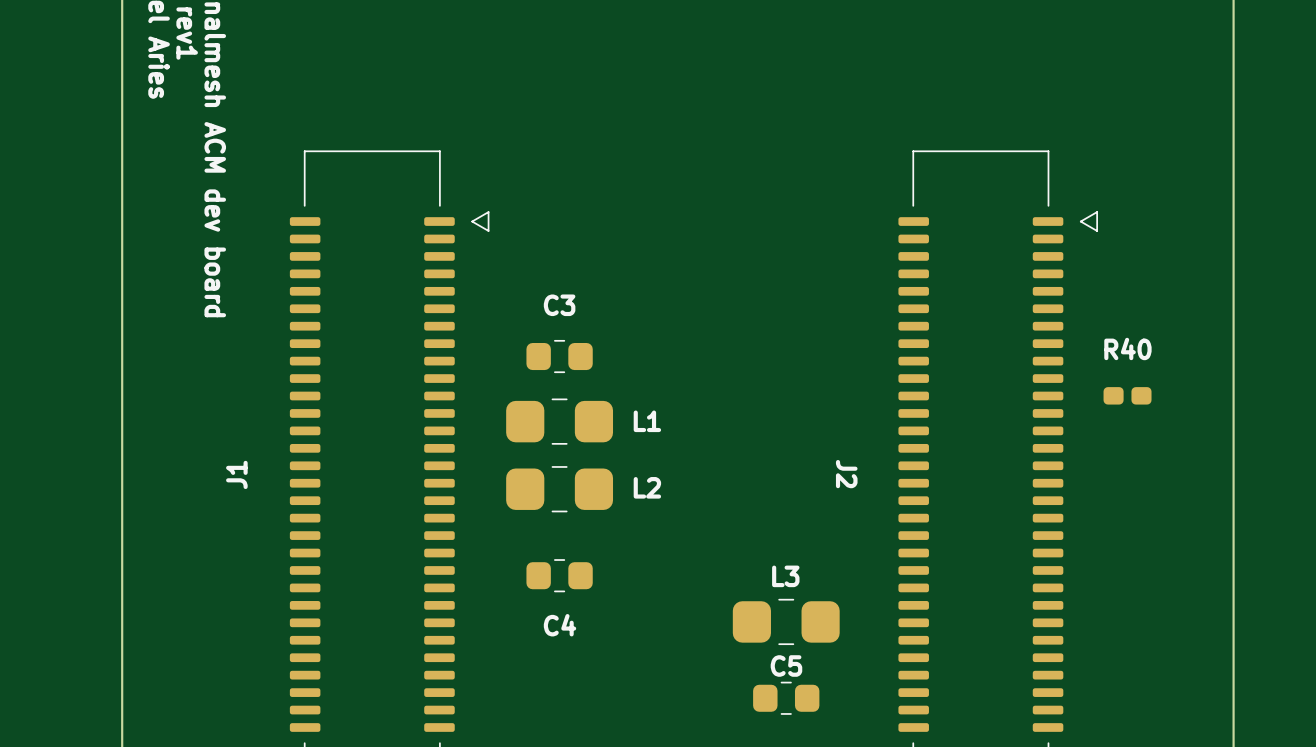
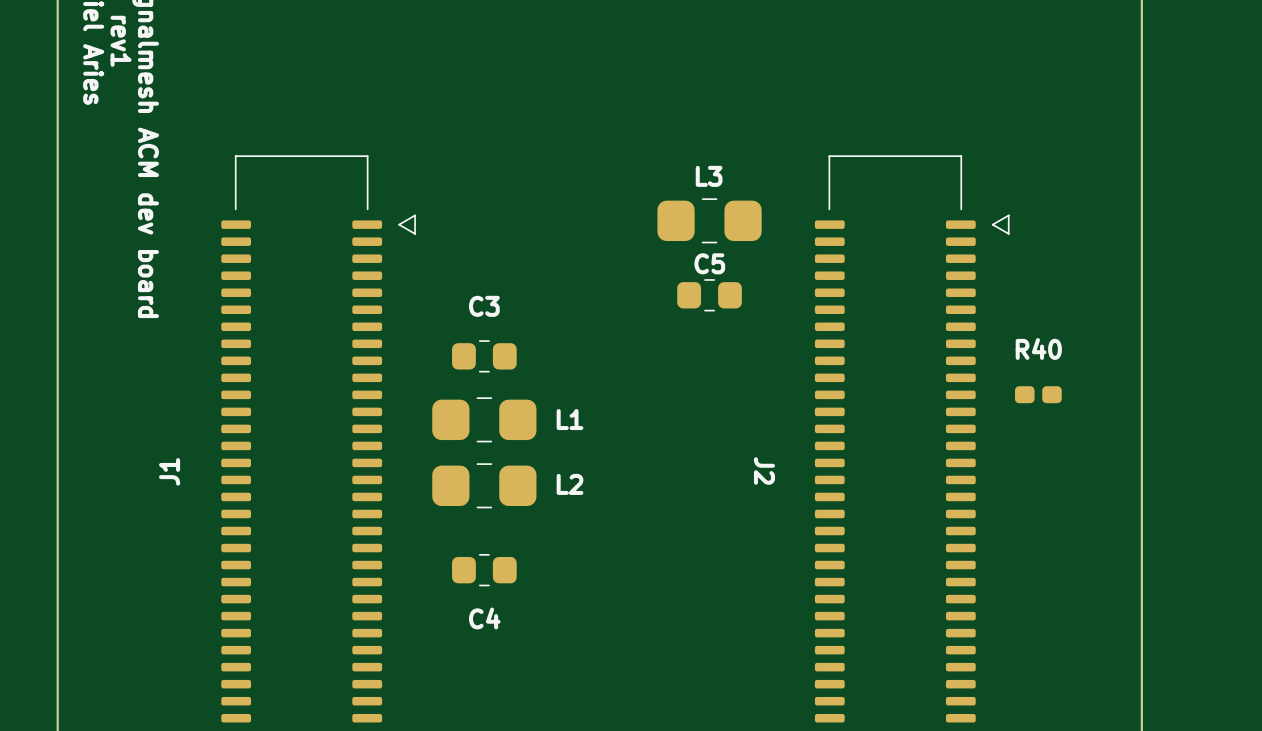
L3 position: (786, 621) -> (709, 220)
C5 position: (786, 698) -> (709, 295)

